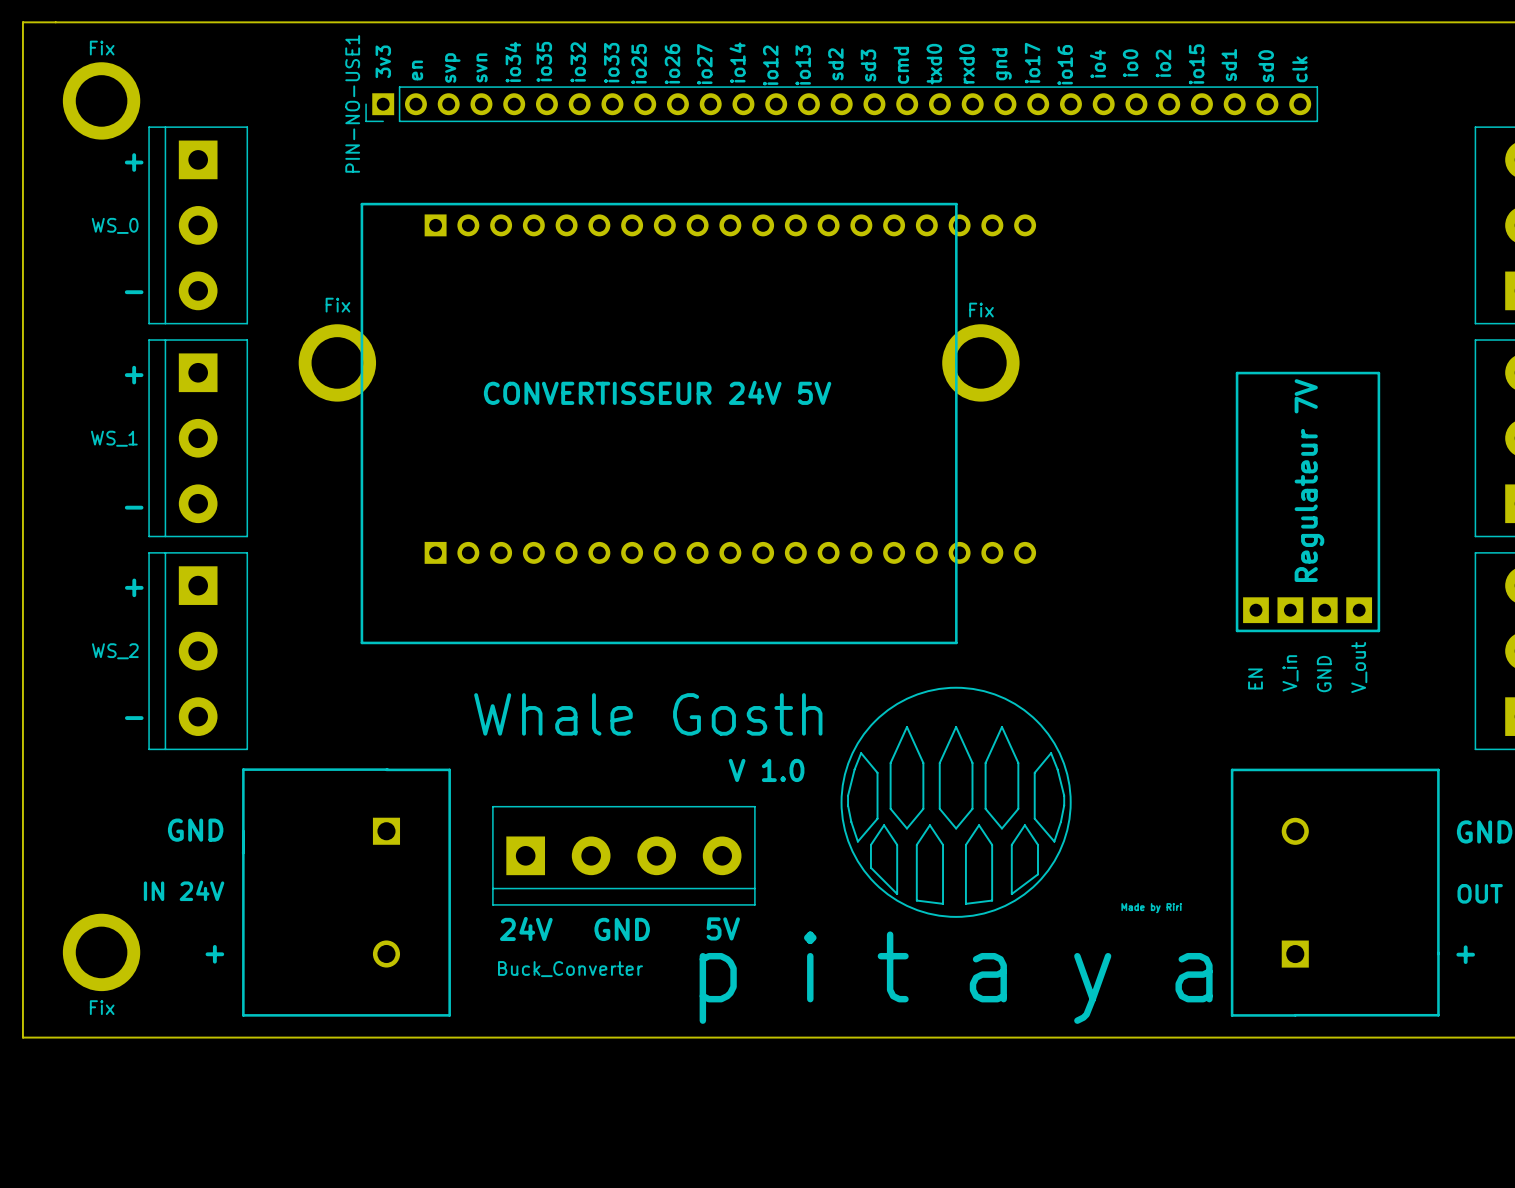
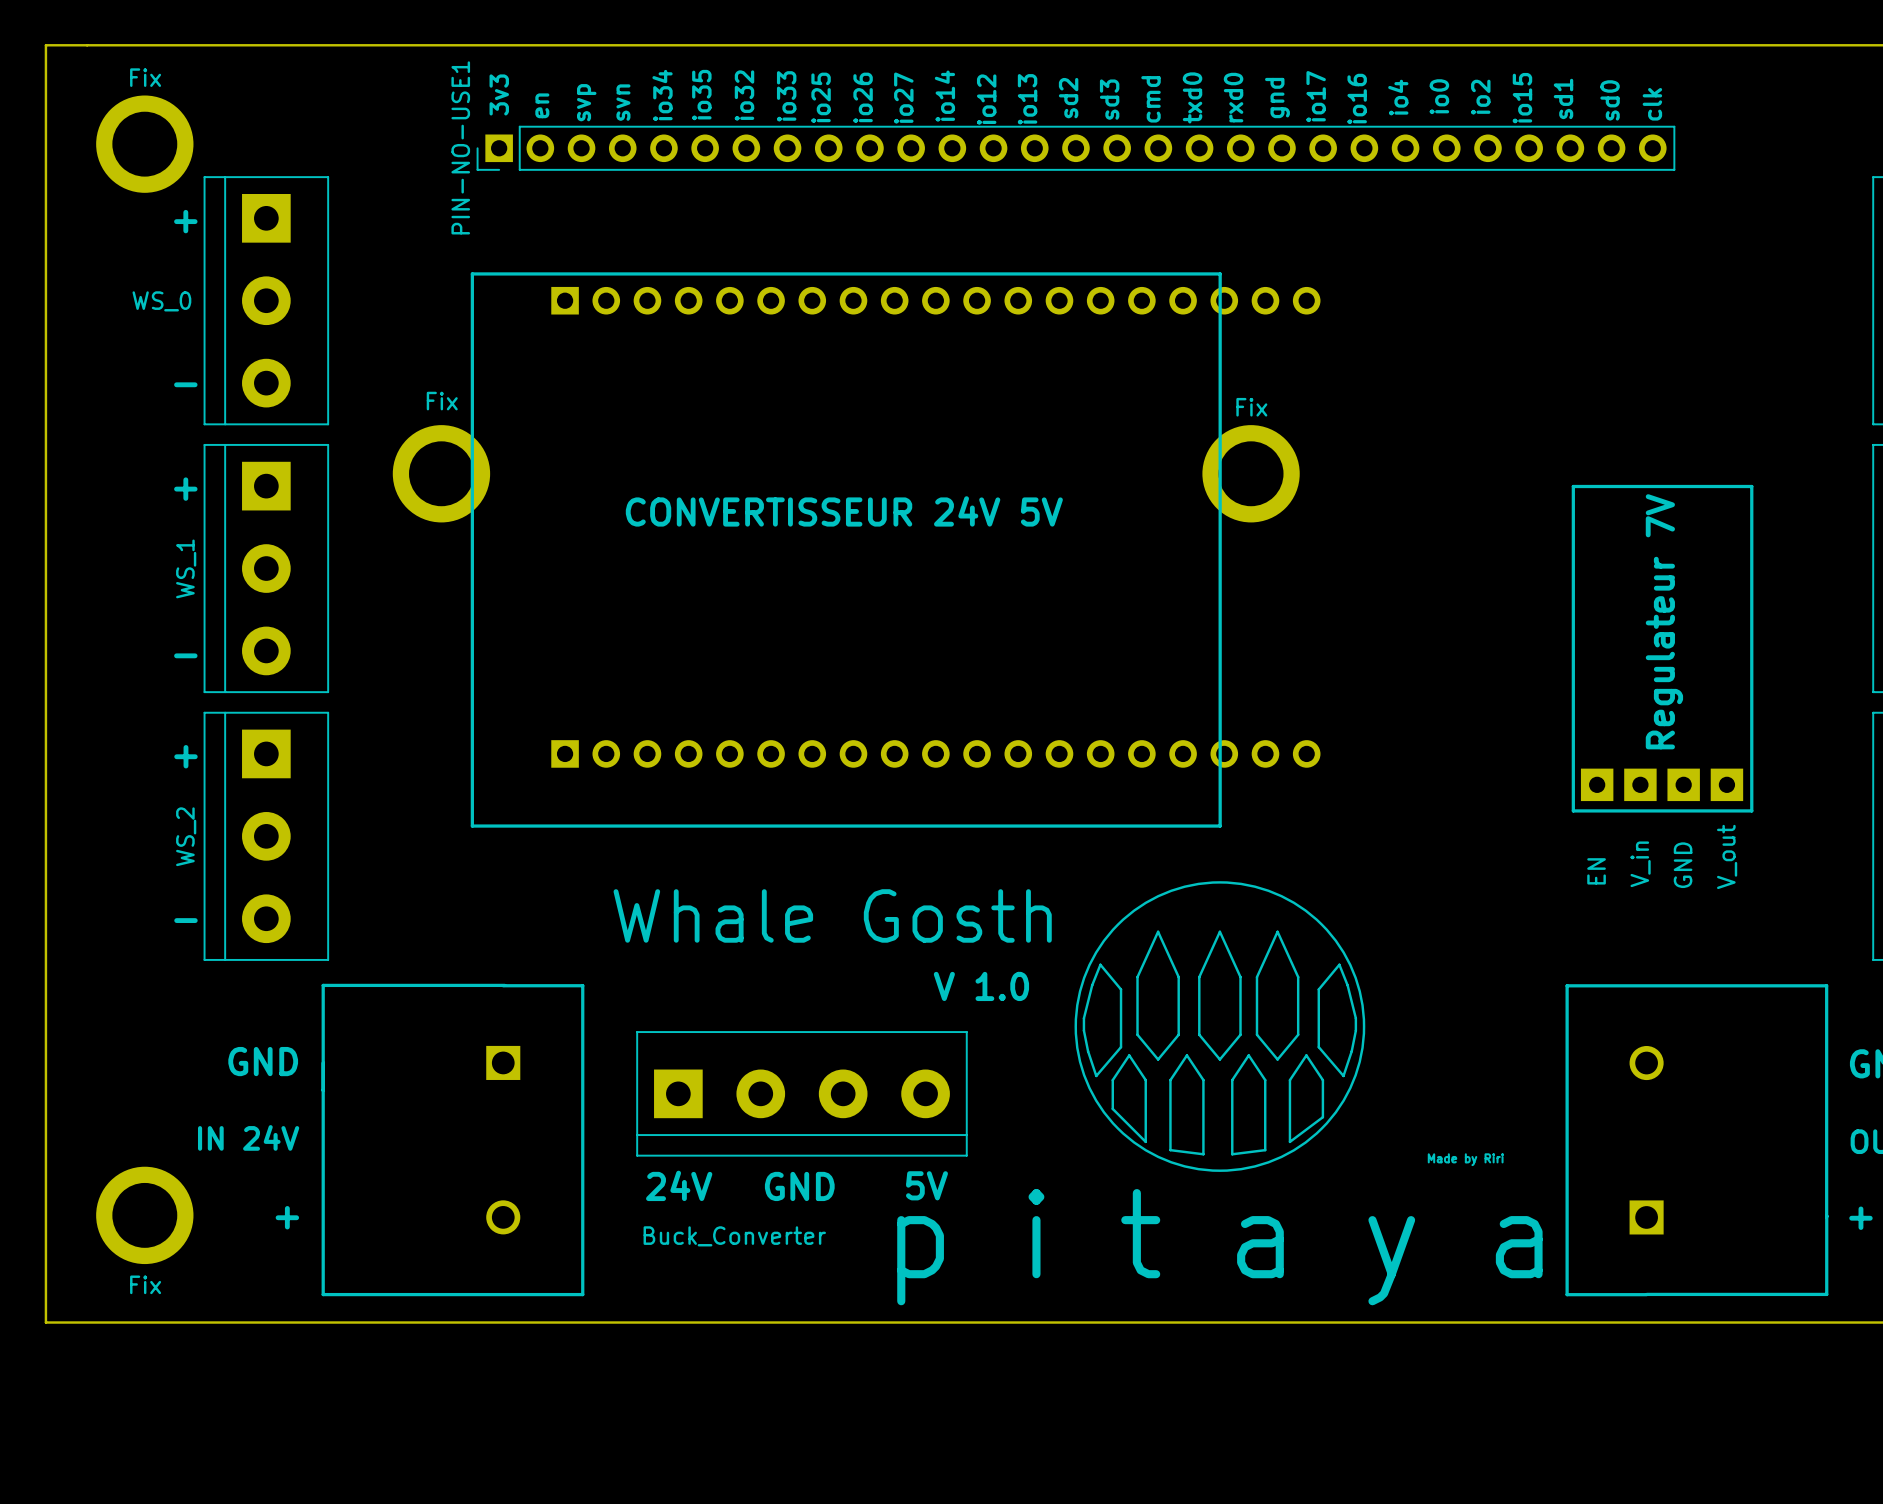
WS_1 name rotation: 0° (114, 438) -> 90° counterclockwise (186, 568)
part position: (730, 552) -> (935, 753)
WS_2 name rotation: 0° (115, 651) -> 90° counterclockwise (186, 836)

